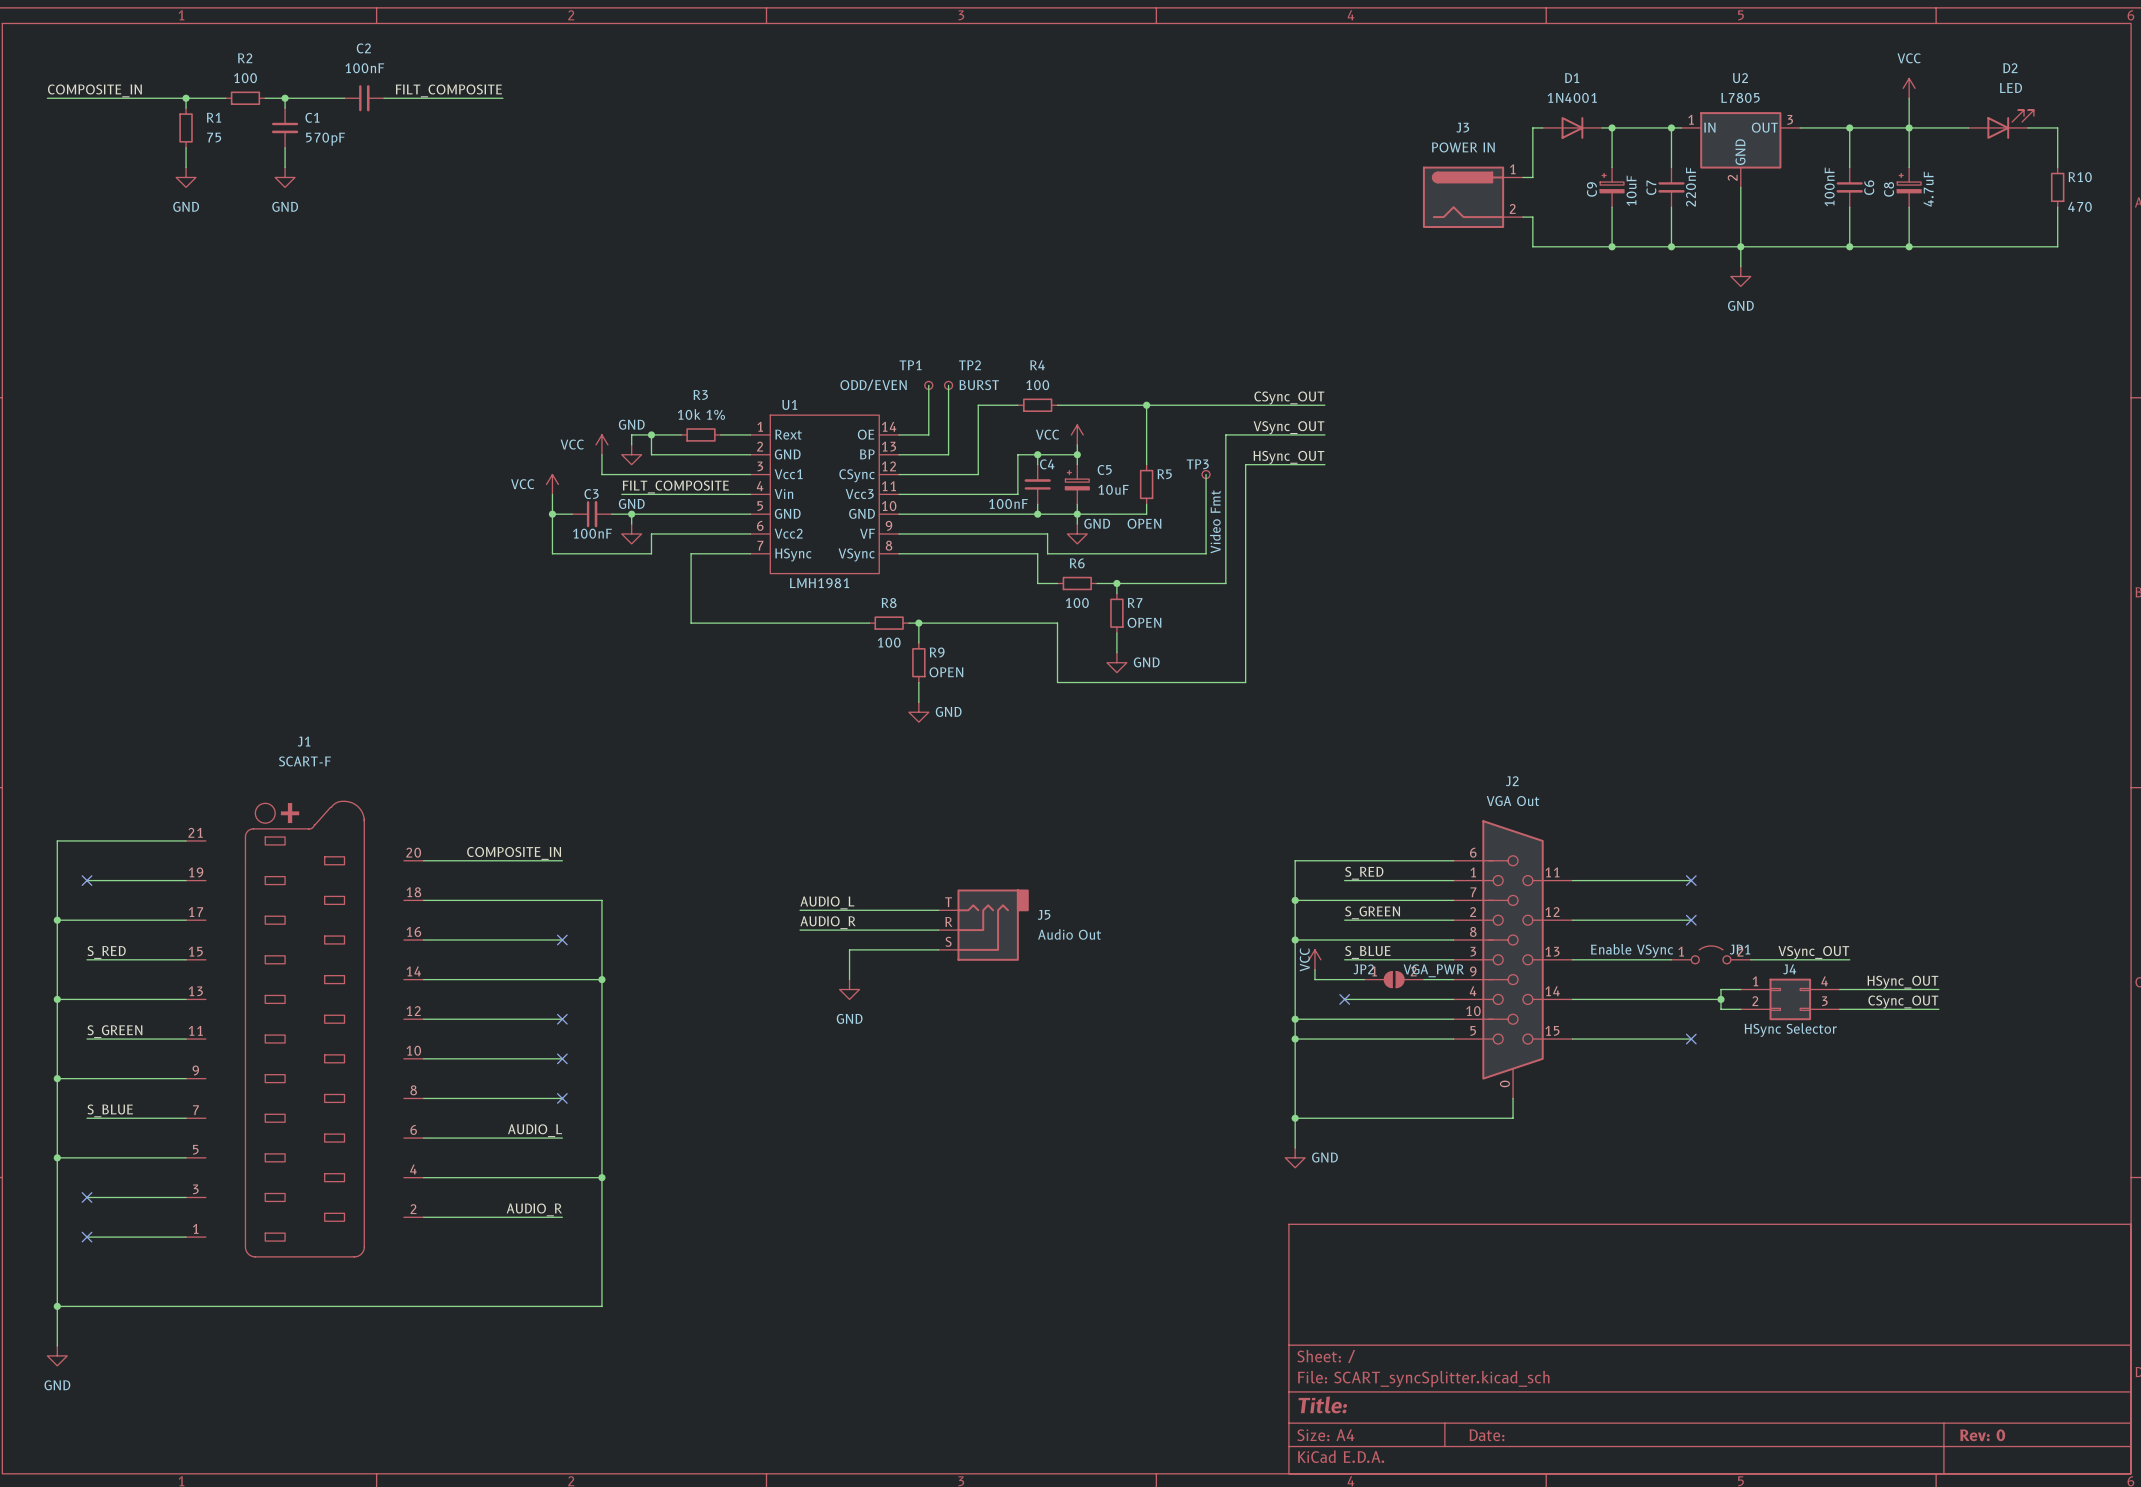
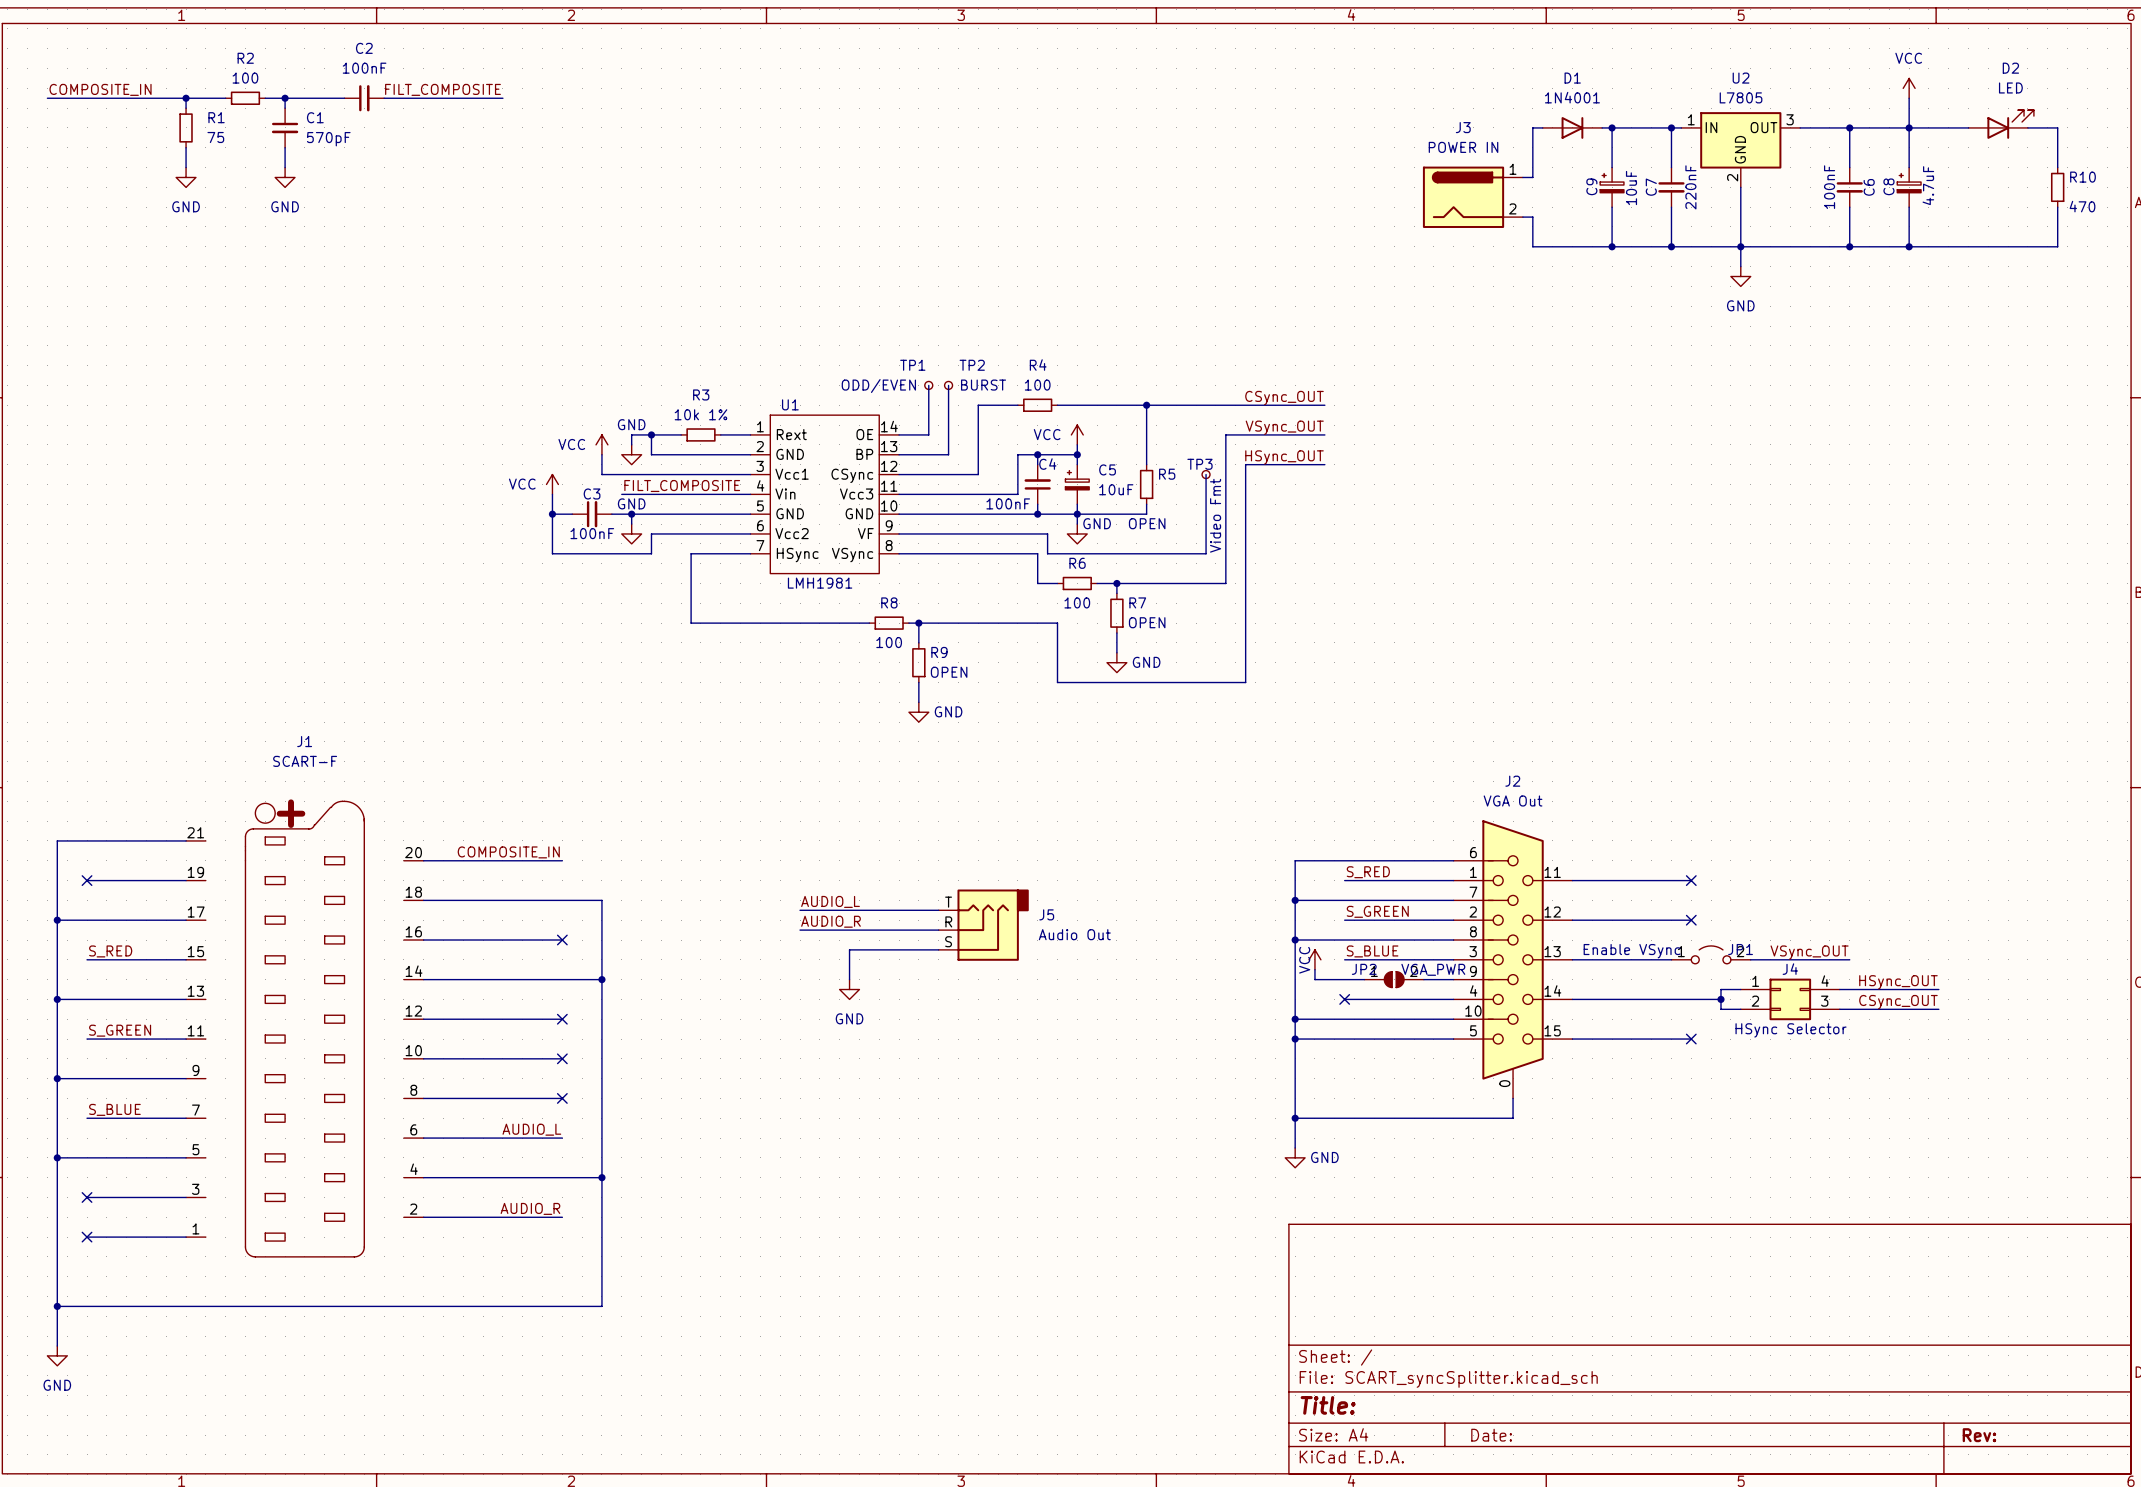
title block: Rev: 0 (1982, 1435) -> Rev: (1979, 1435)

